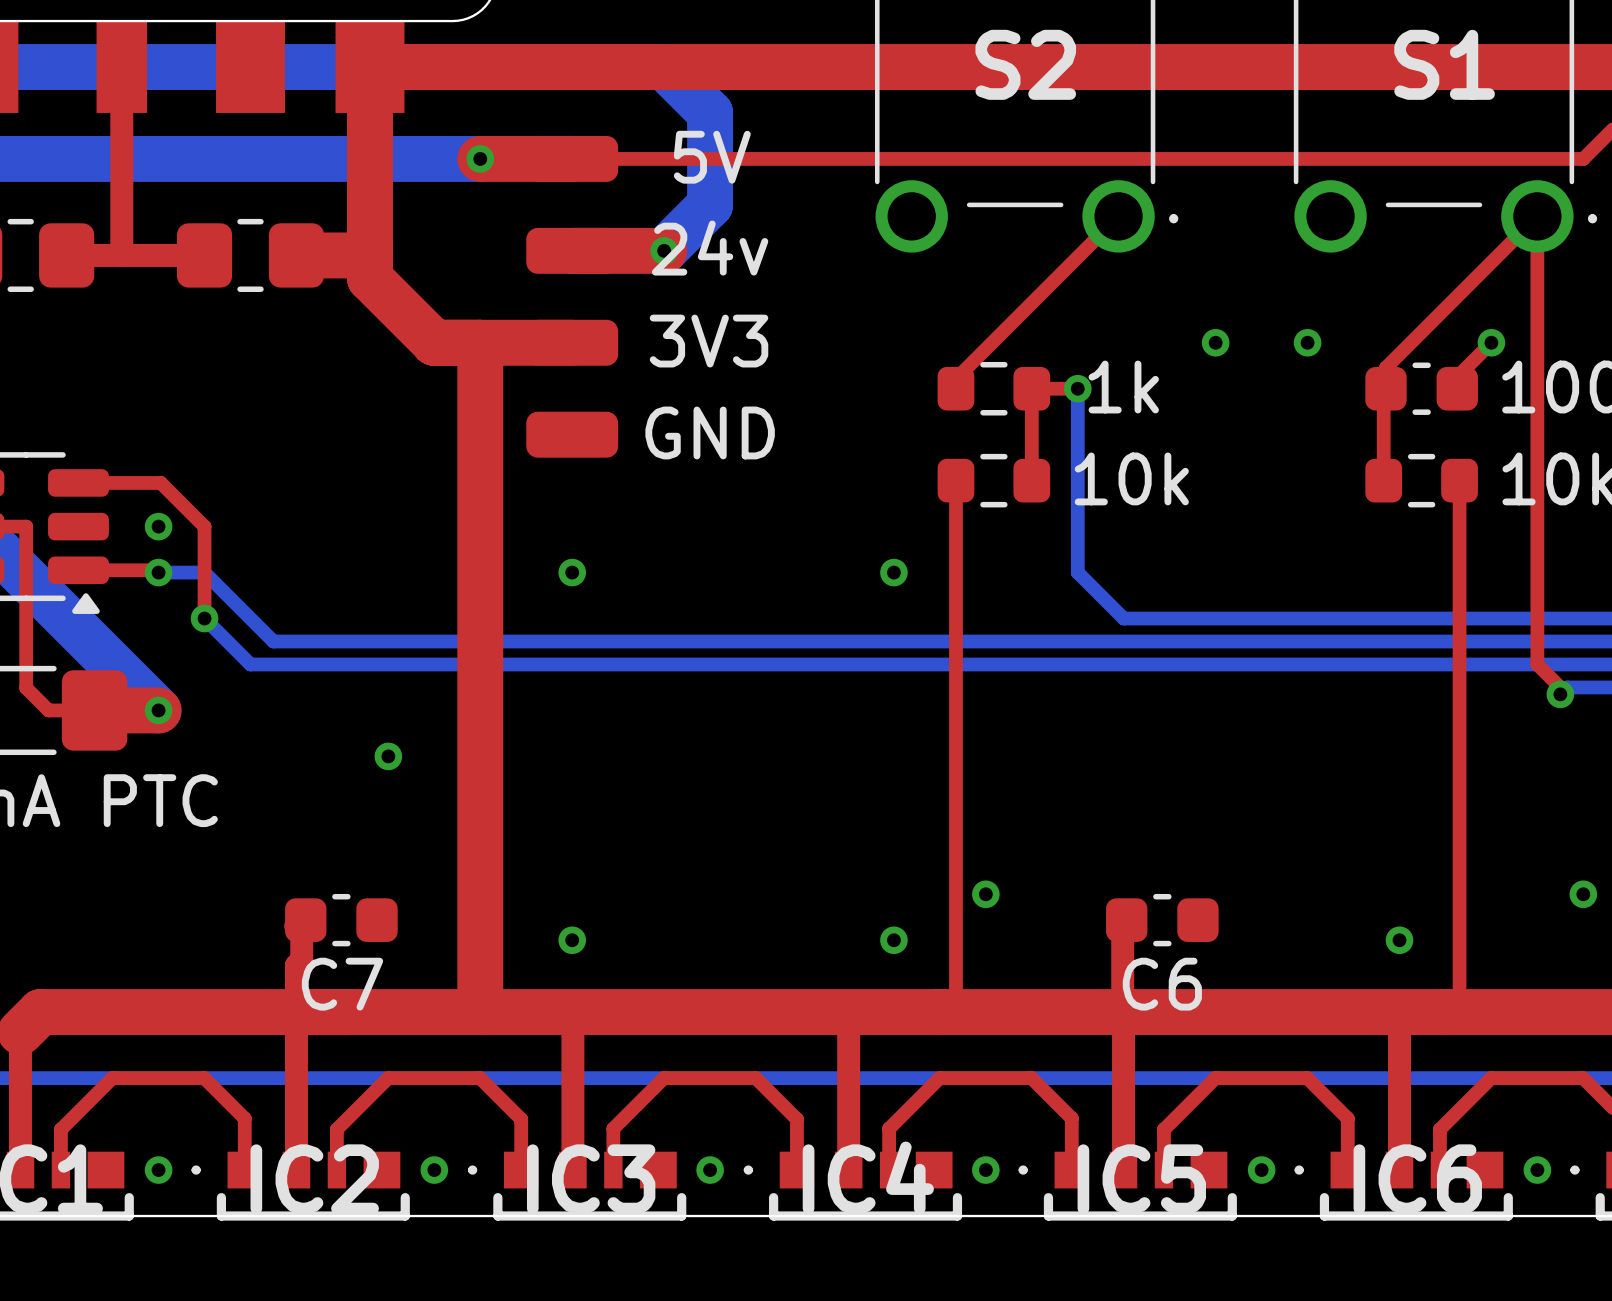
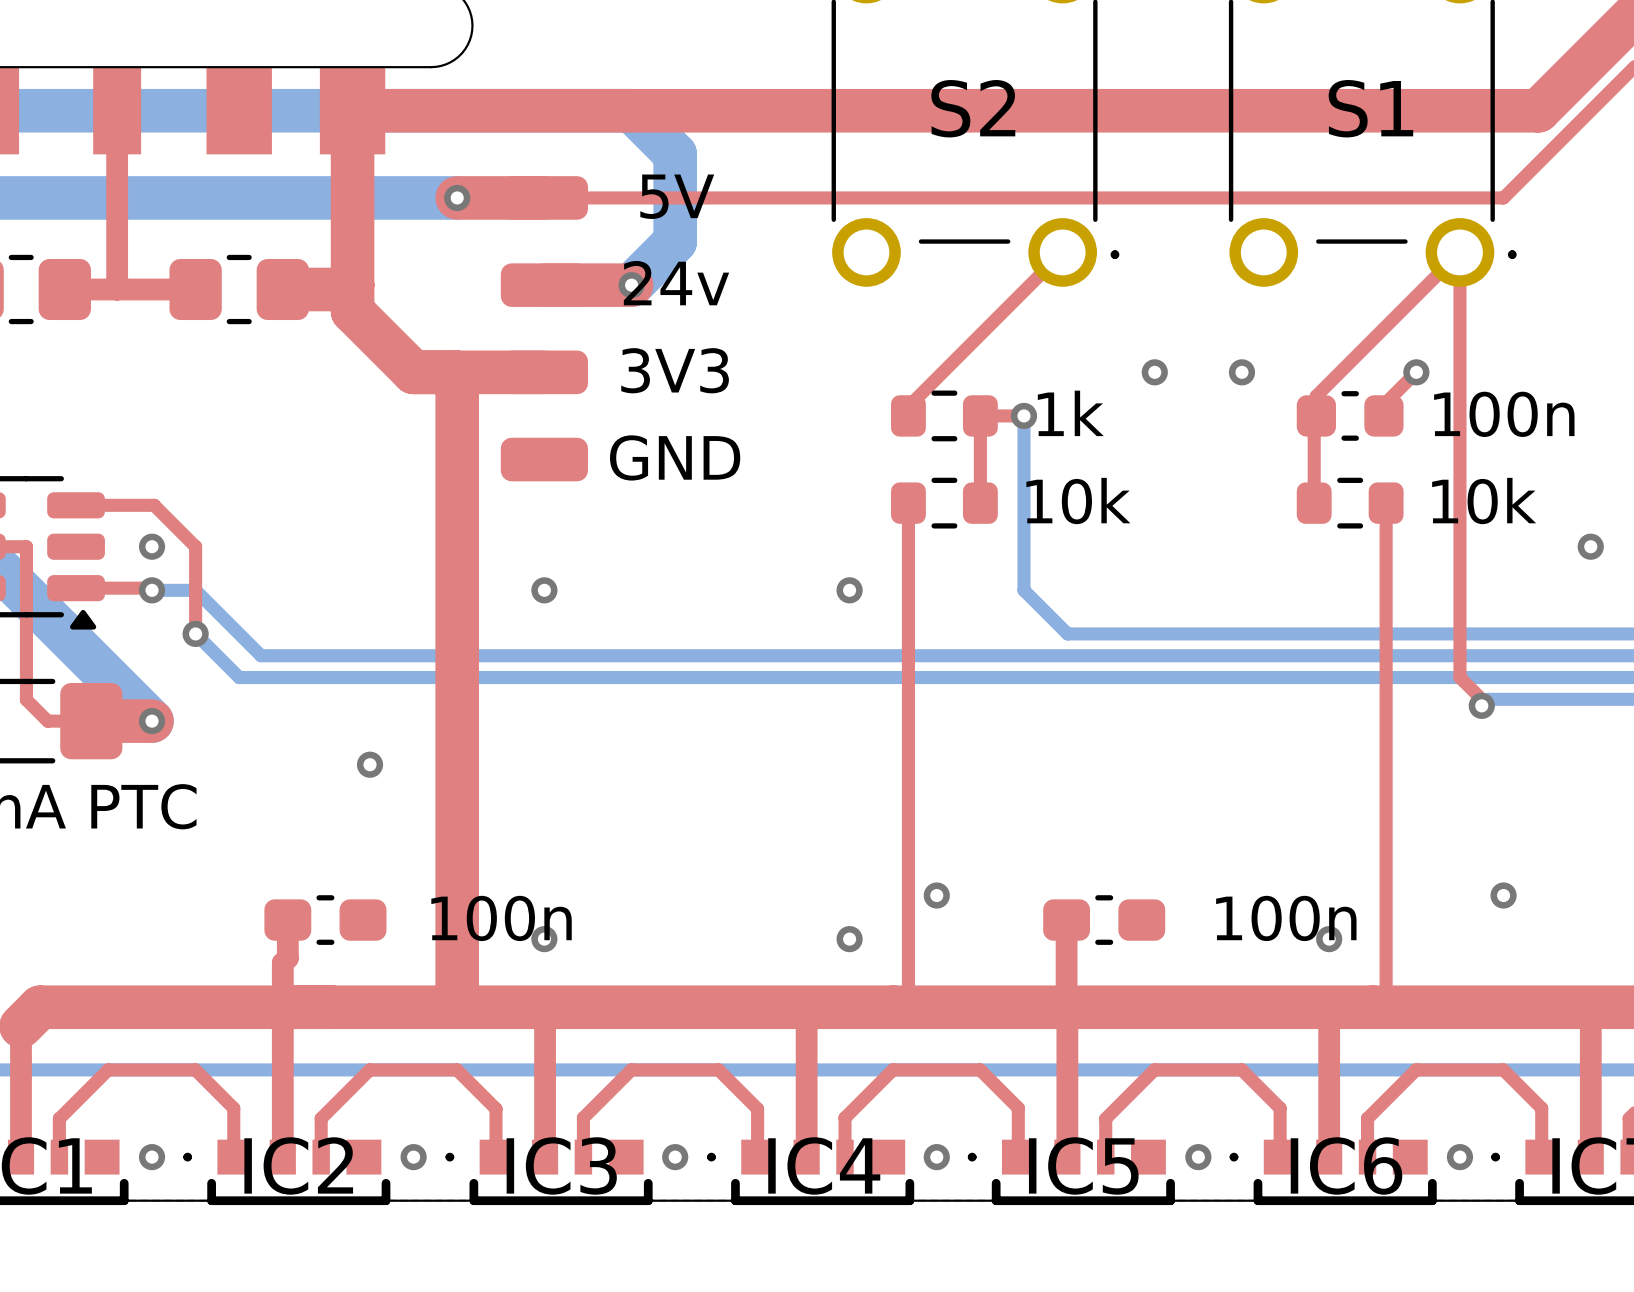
C7: (341, 920) -> none
part: none -> 100n (325, 920)
C6: (1162, 920) -> none
part: none -> 100n (1104, 920)

